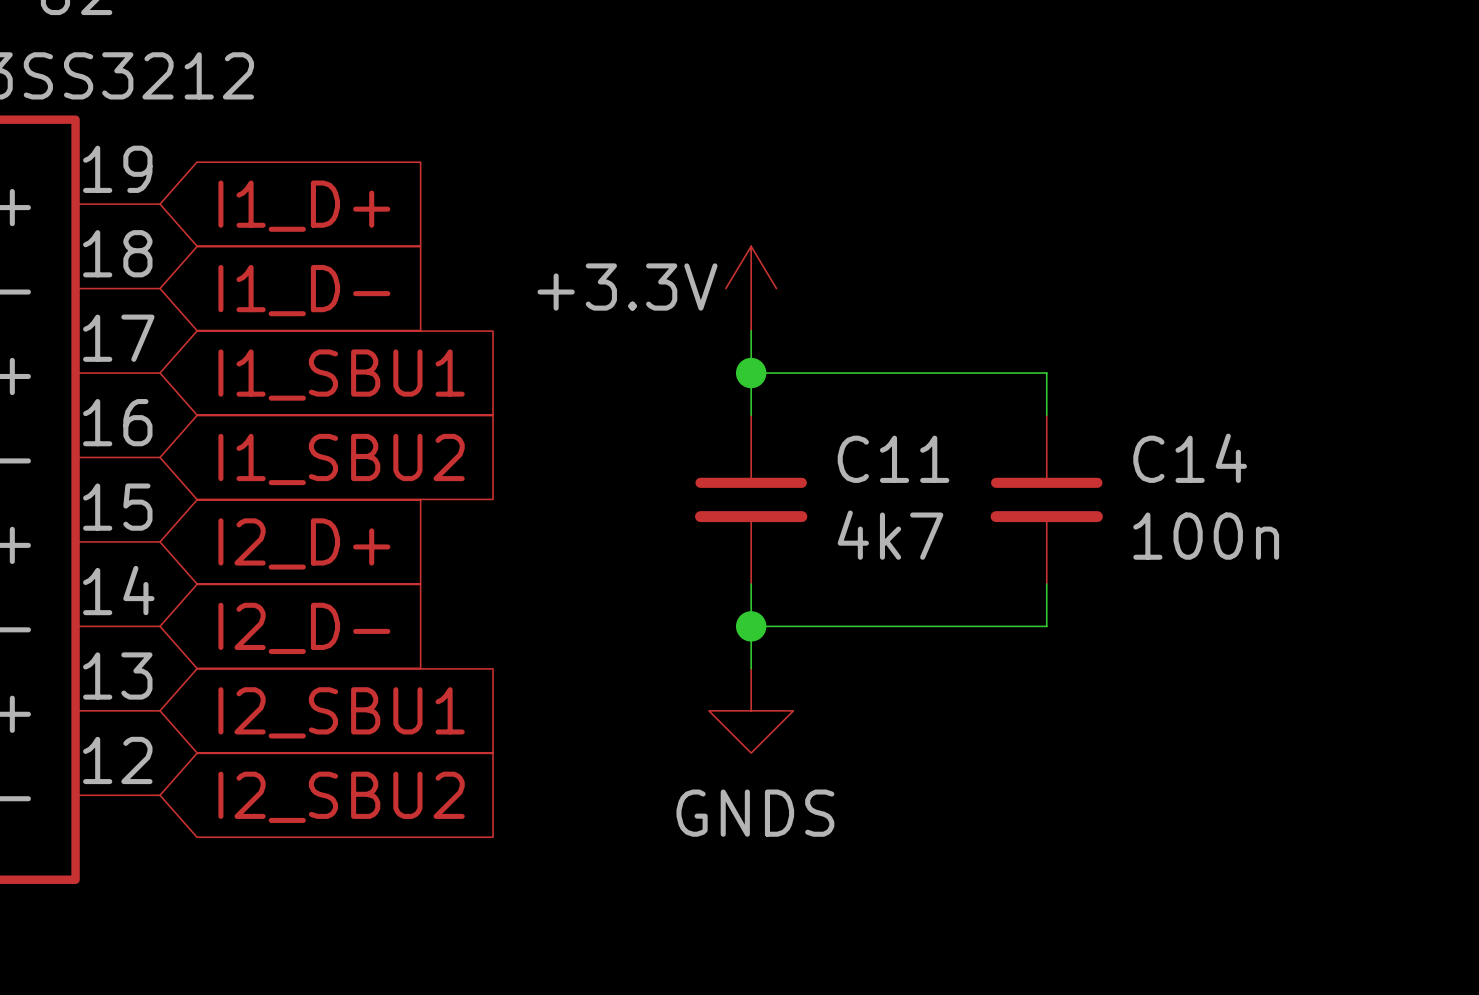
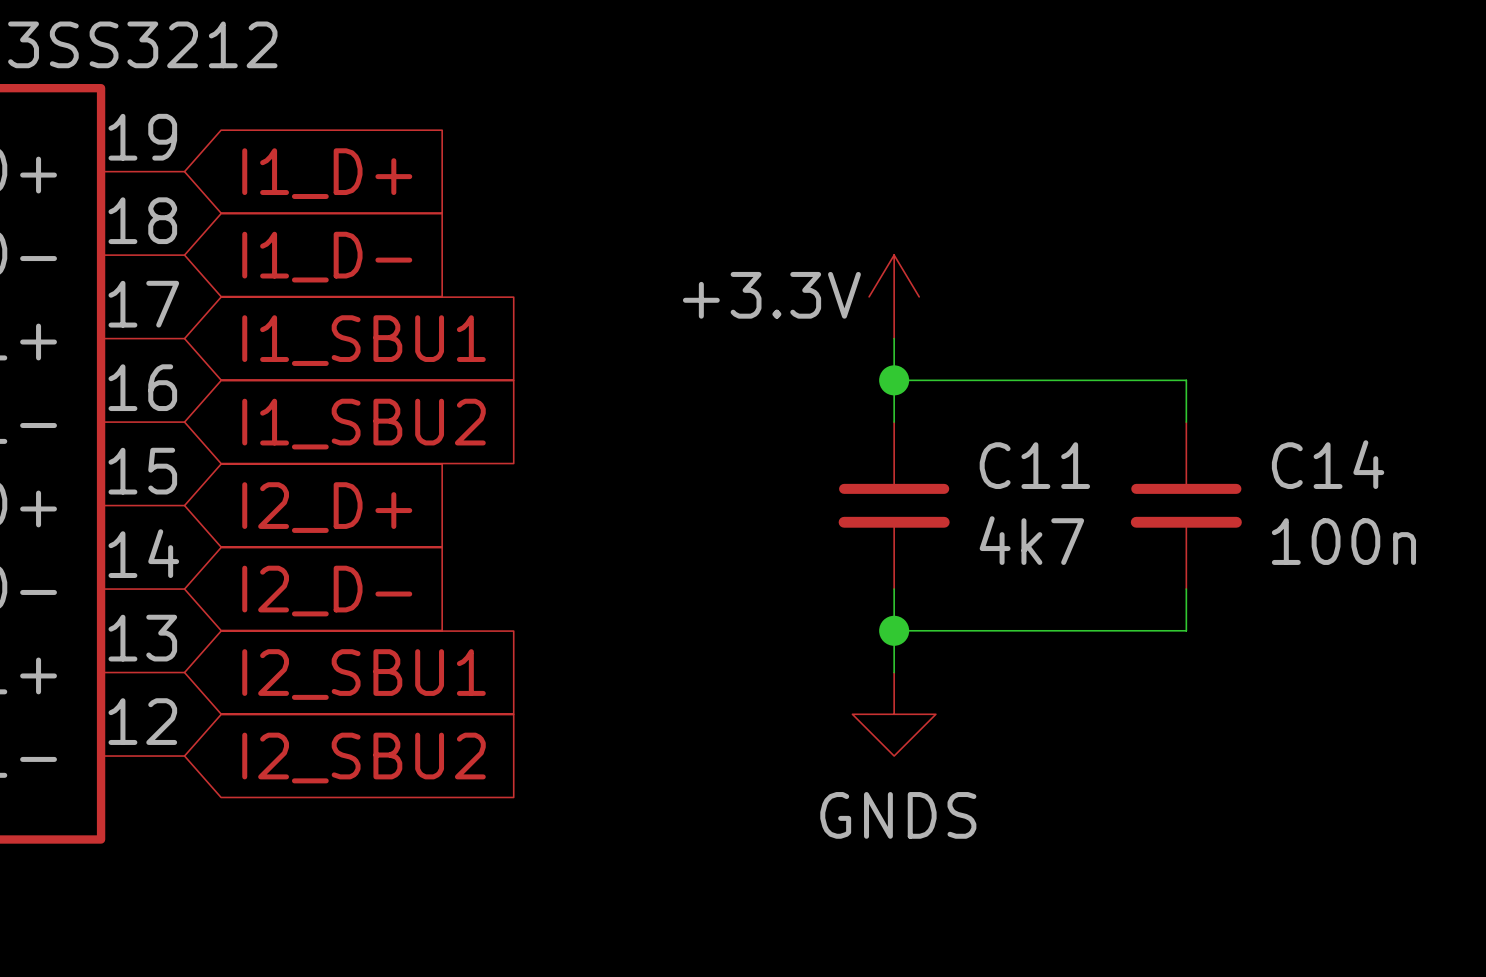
power symbol position: +3.3V (751, 288) -> +3.3V (894, 296)
wire: (751, 330) (751, 415) -> (894, 338) (894, 422)
wire: (751, 373) (1046, 373) (1046, 415) -> (894, 380) (1186, 380) (1186, 422)
junction: (751, 373) -> none
junction: none -> (894, 380)
C11 position: (751, 499) -> (894, 505)
C14 position: (1046, 499) -> (1186, 505)
wire: (751, 584) (751, 668) -> (894, 589) (894, 672)
wire: (1046, 584) (1046, 626) (751, 626) -> (1186, 589) (1186, 630) (894, 630)
junction: (751, 626) -> none
junction: none -> (894, 630)
power symbol position: GNDS (751, 710) -> GNDS (894, 714)

